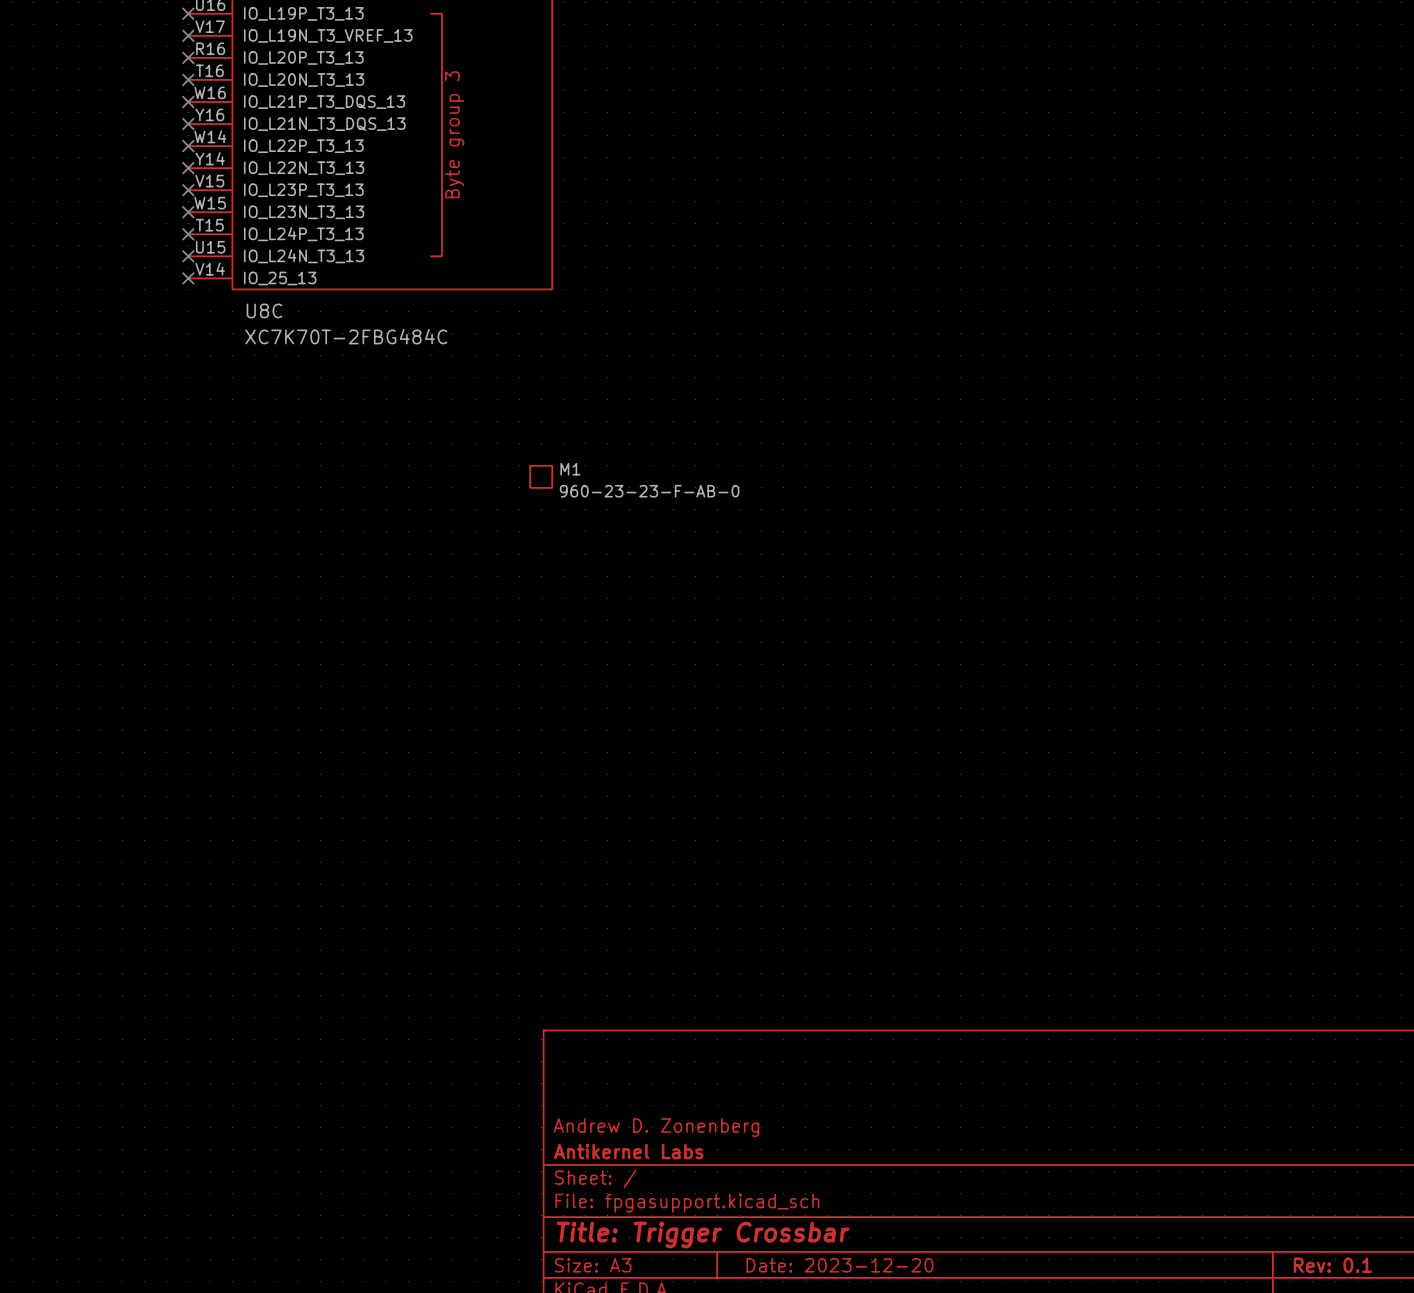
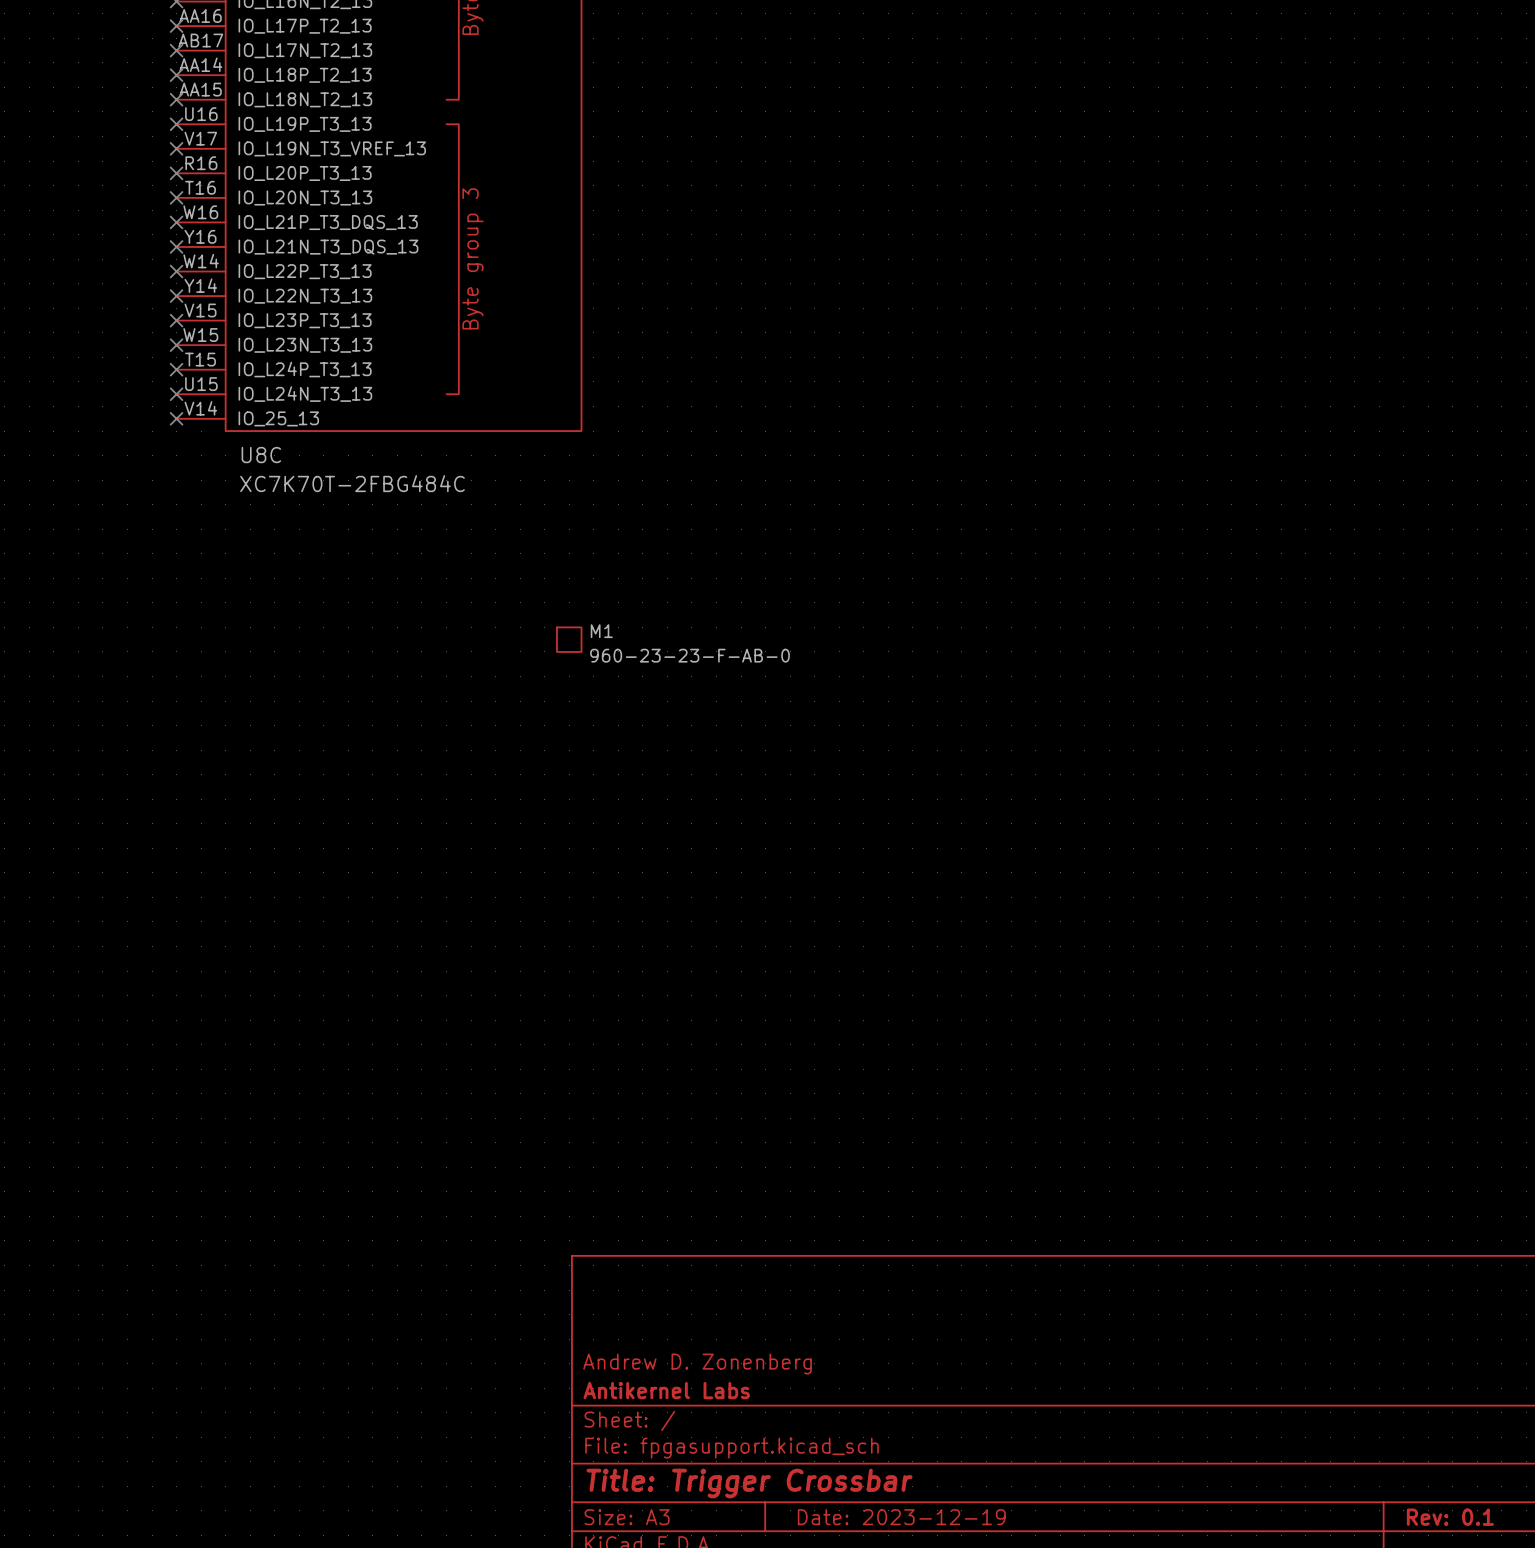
title block: Date: 2023-12-20 (839, 1265) -> Date: 2023-12-19 (901, 1517)

